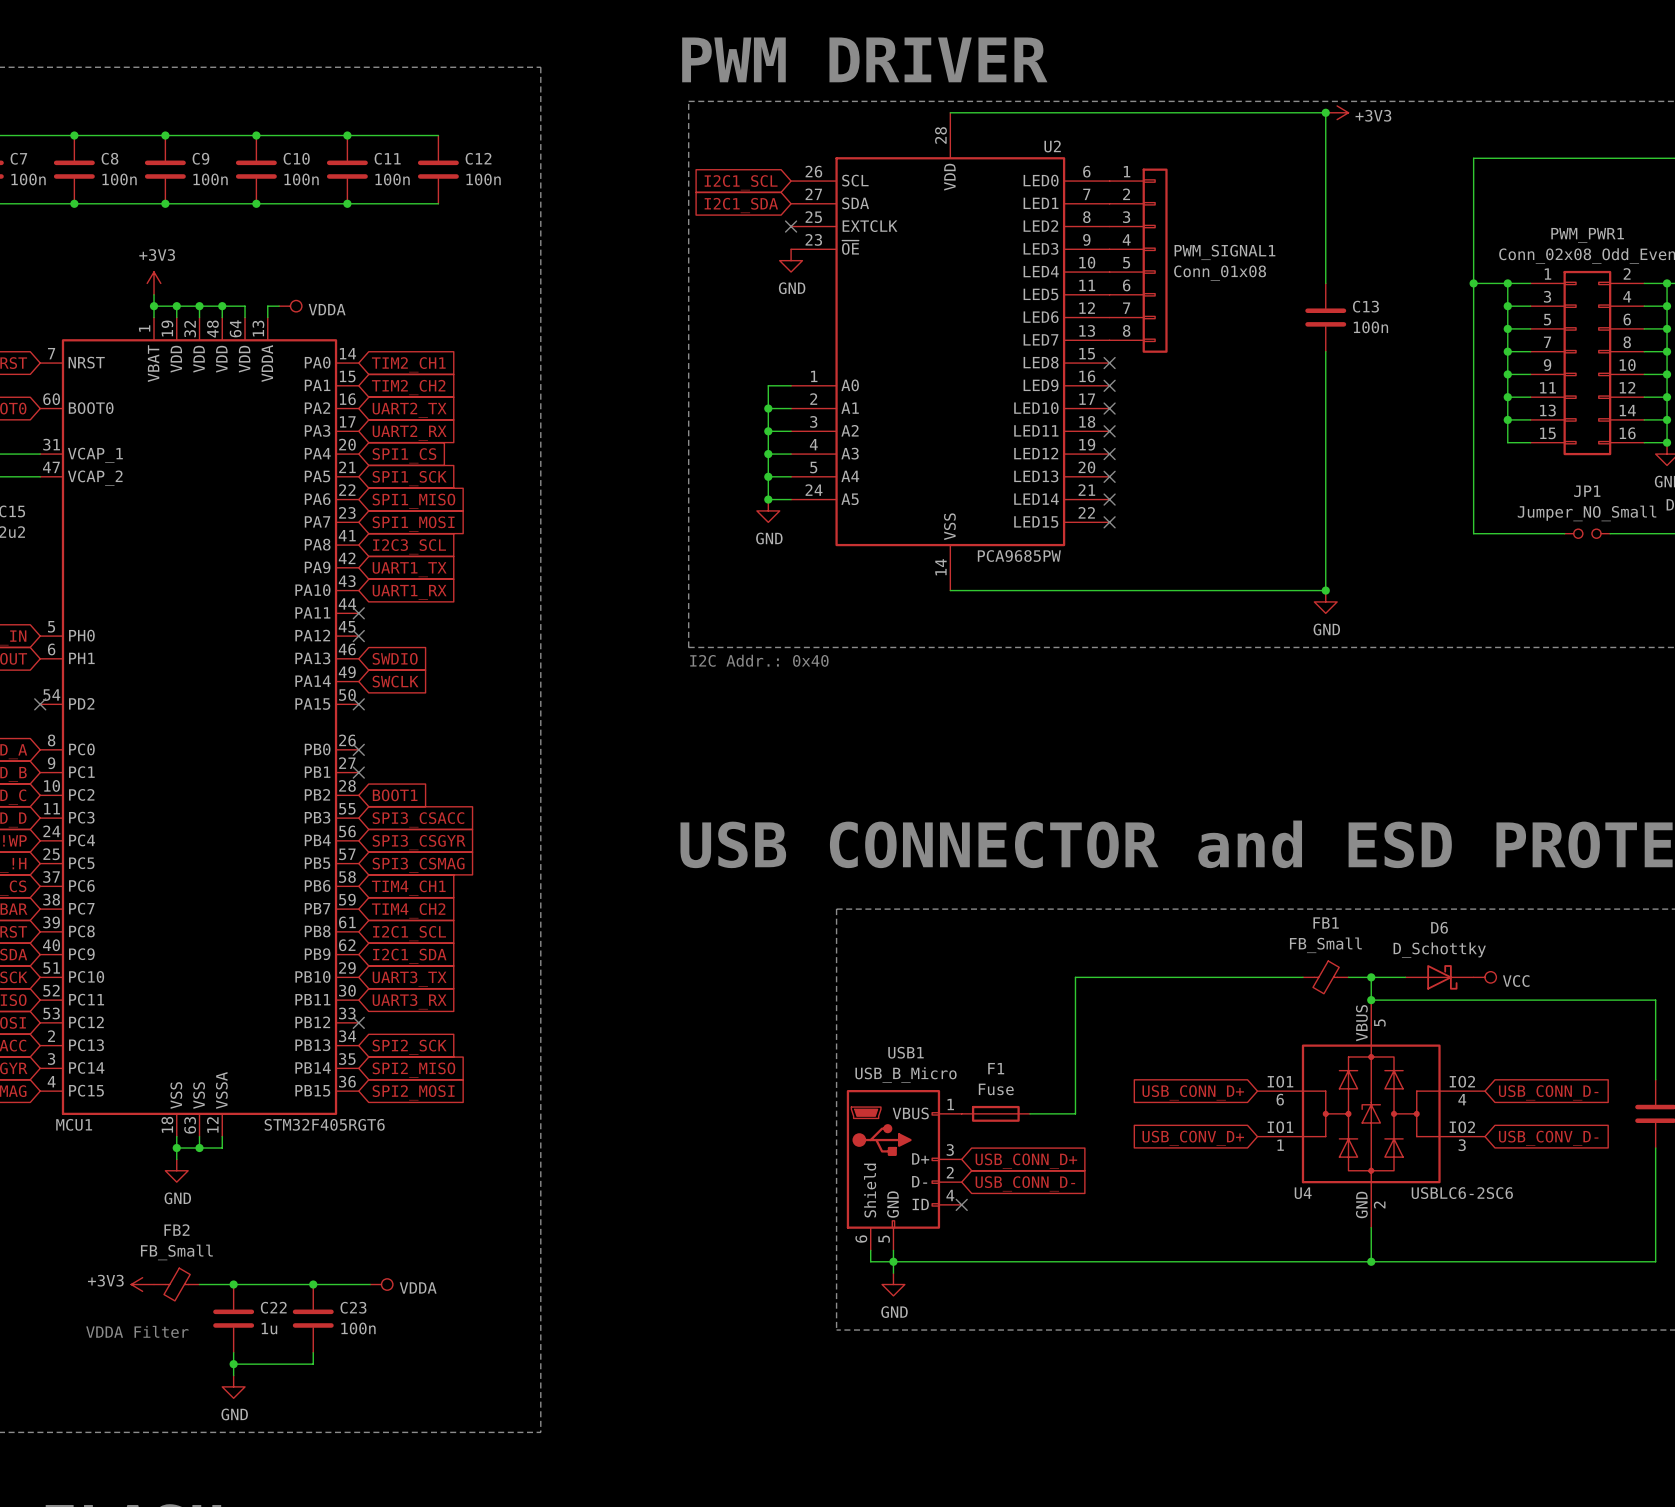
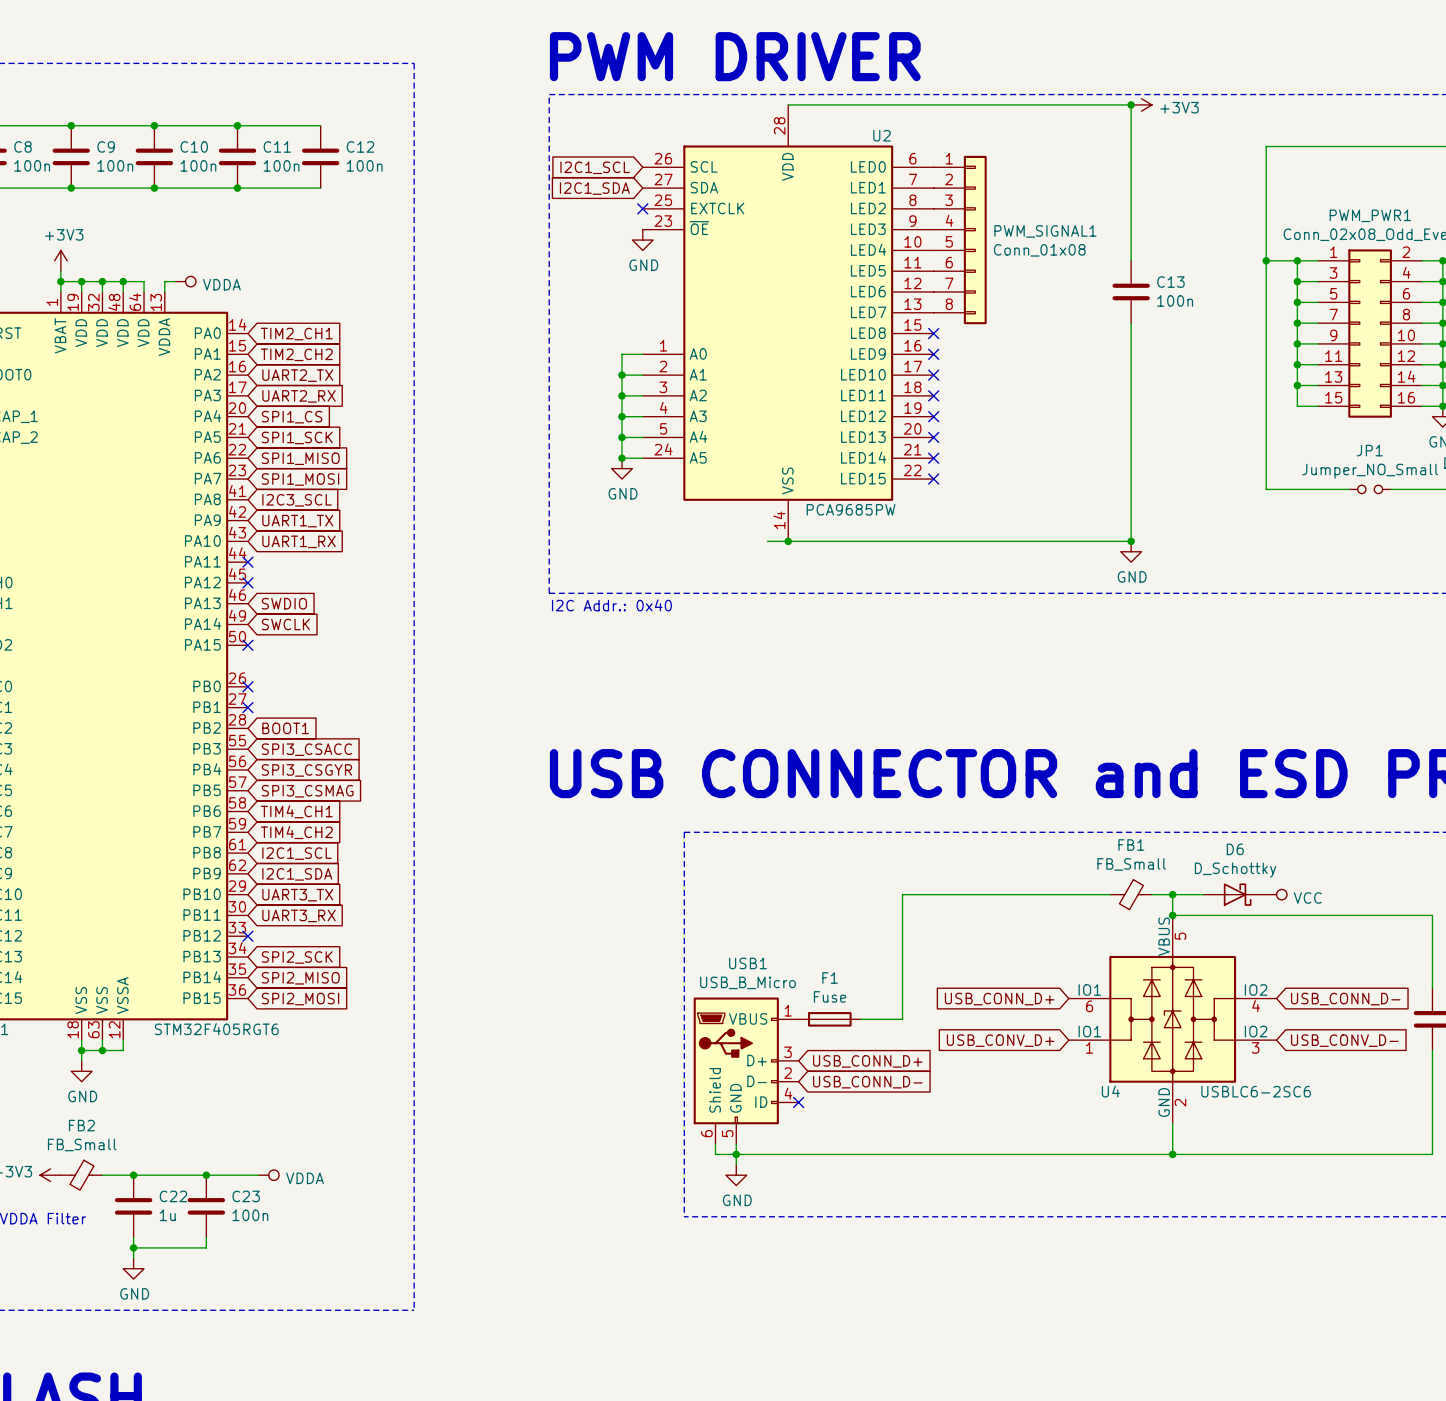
wire: none -> (767, 541) (788, 541)
junction: none -> (788, 541)

